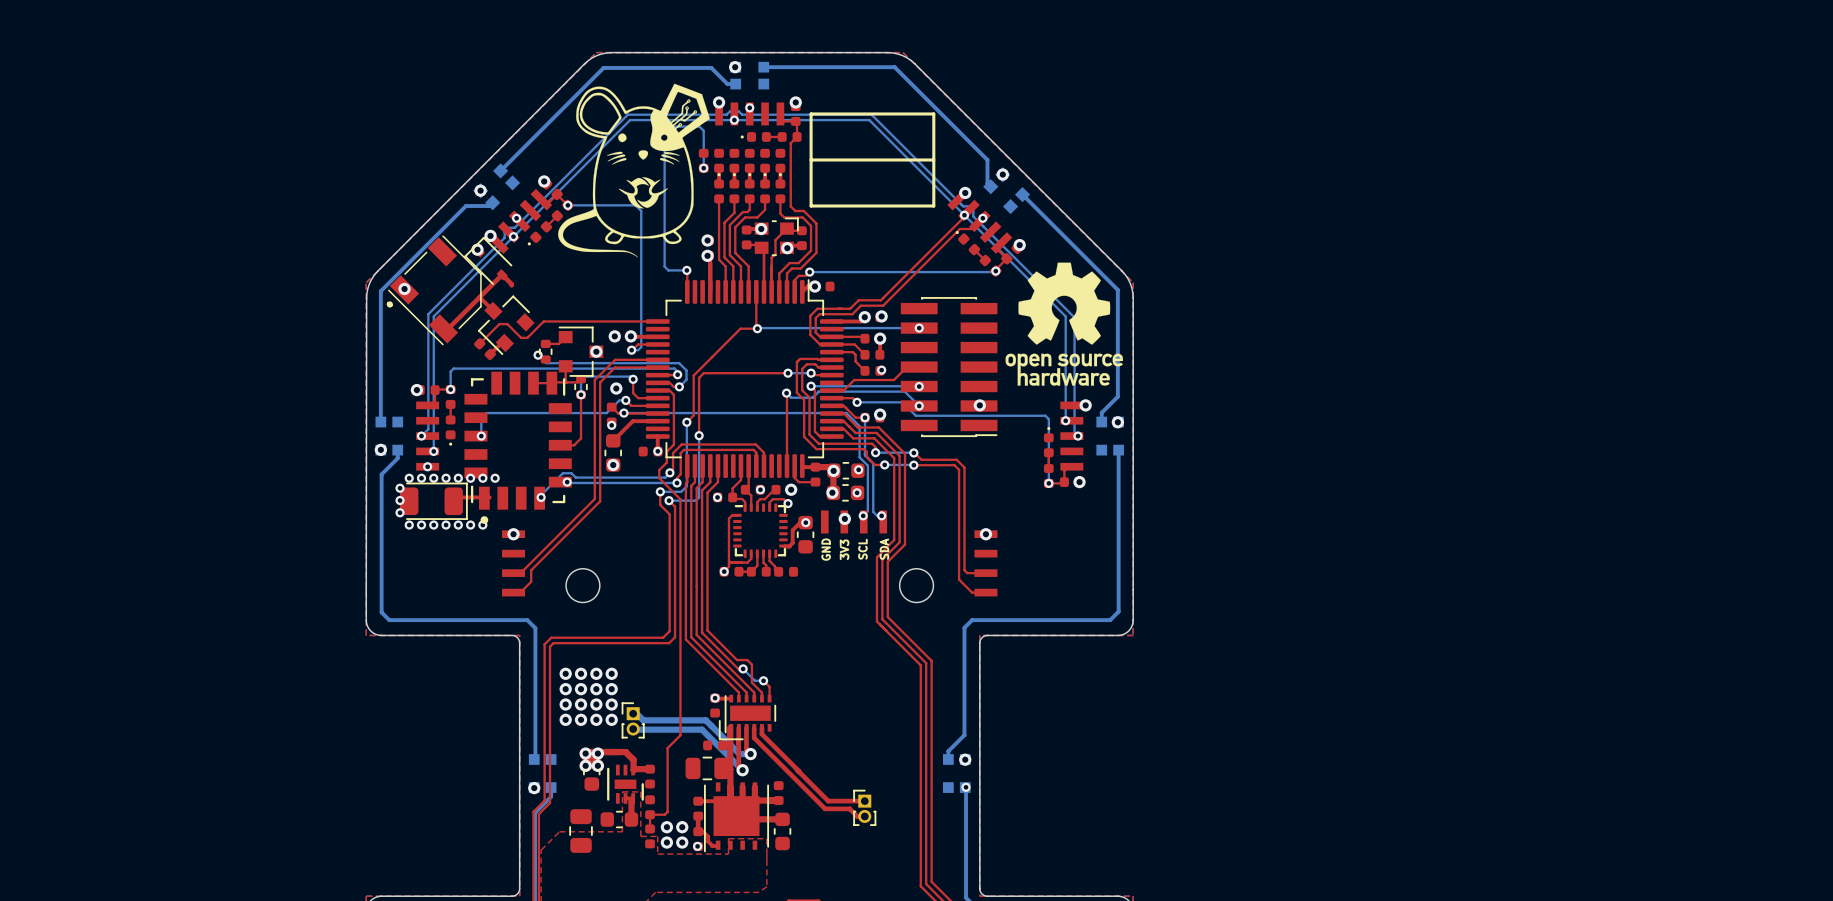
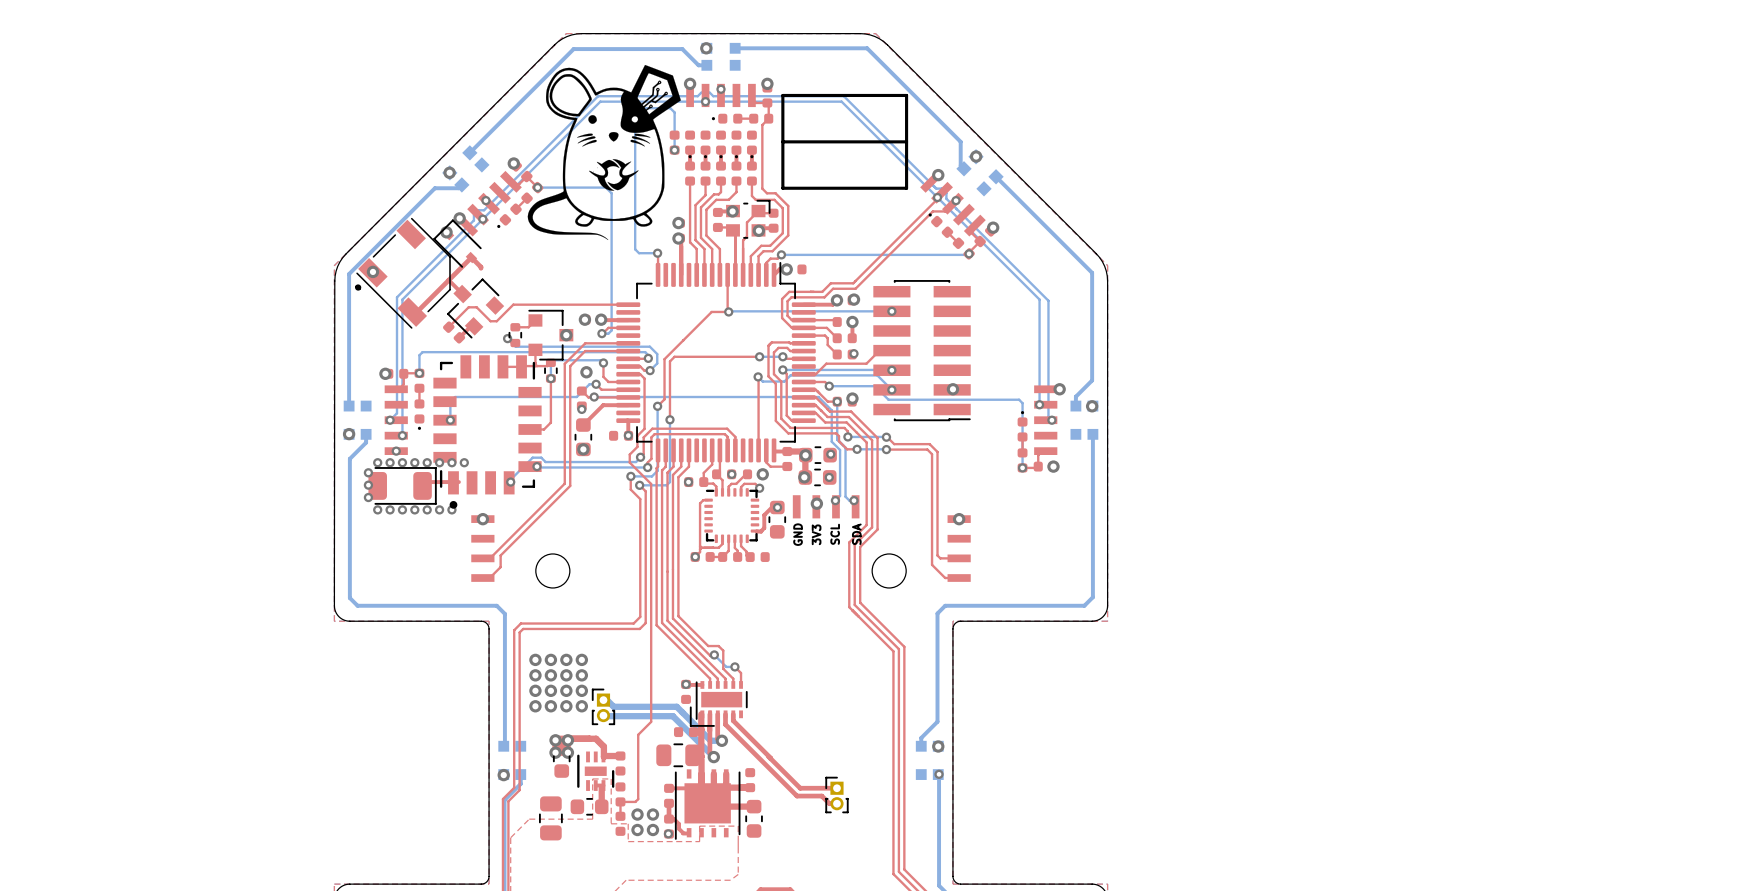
drawing: [1005, 262, 1123, 386] -> none

